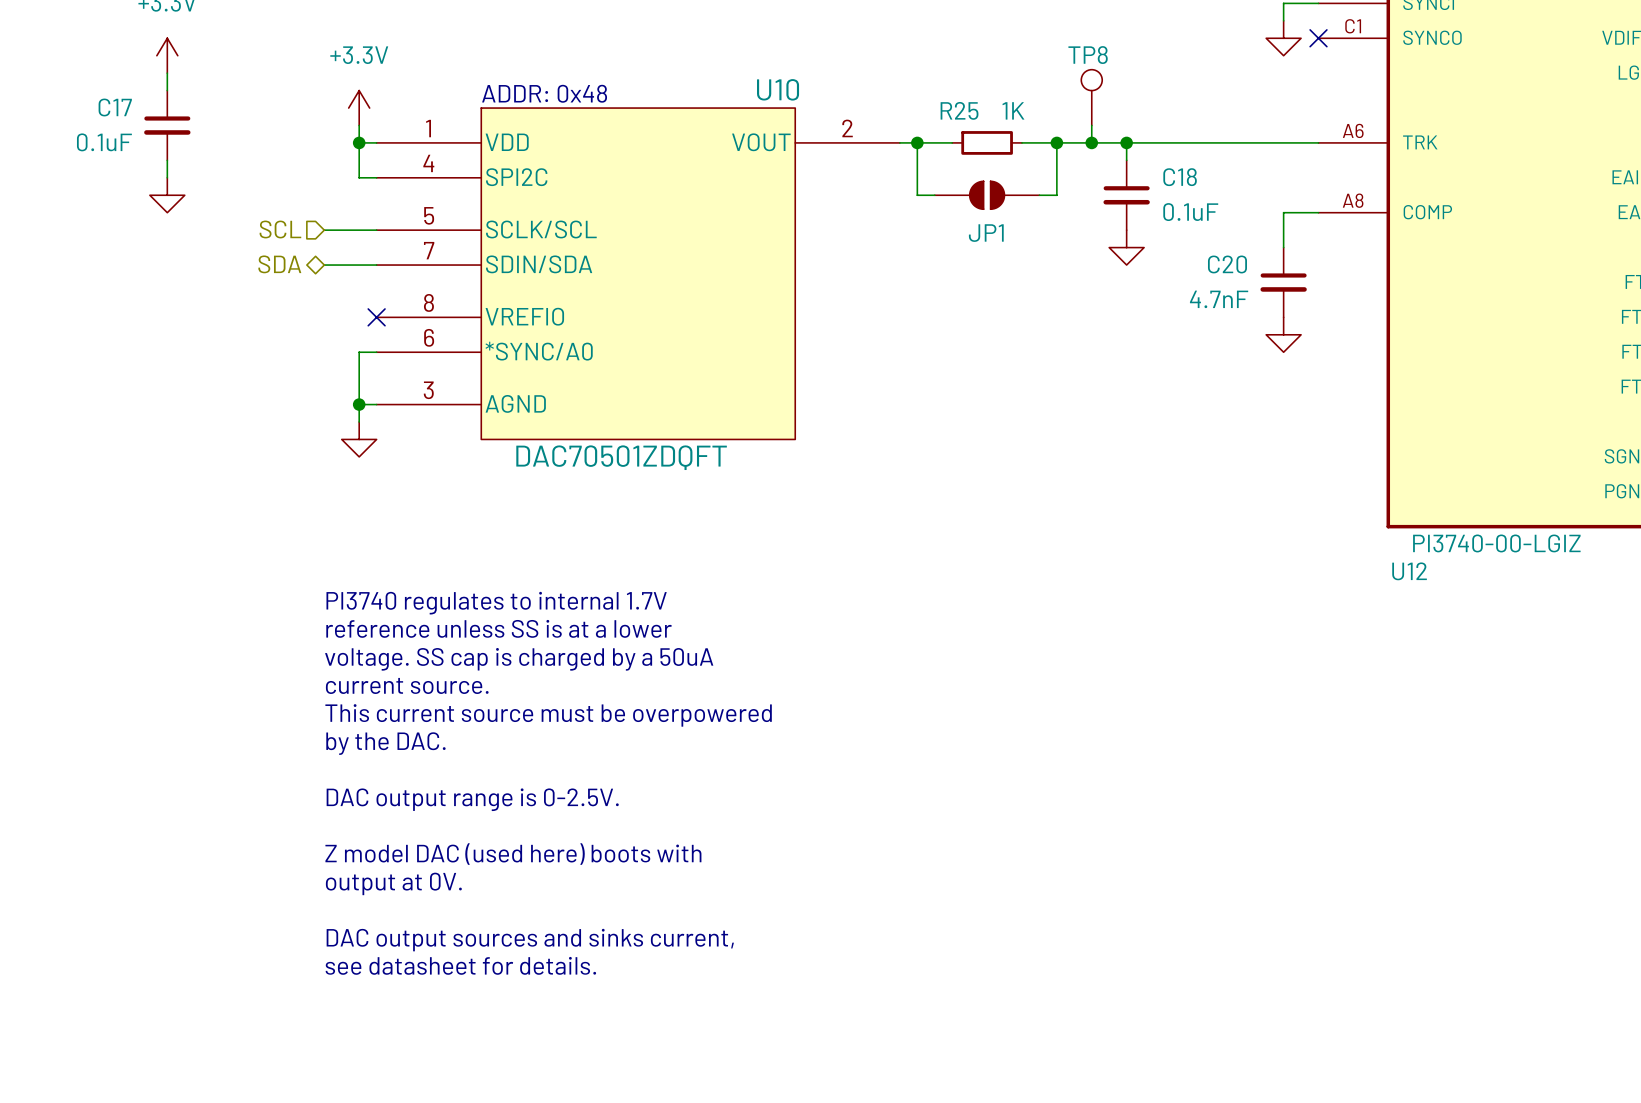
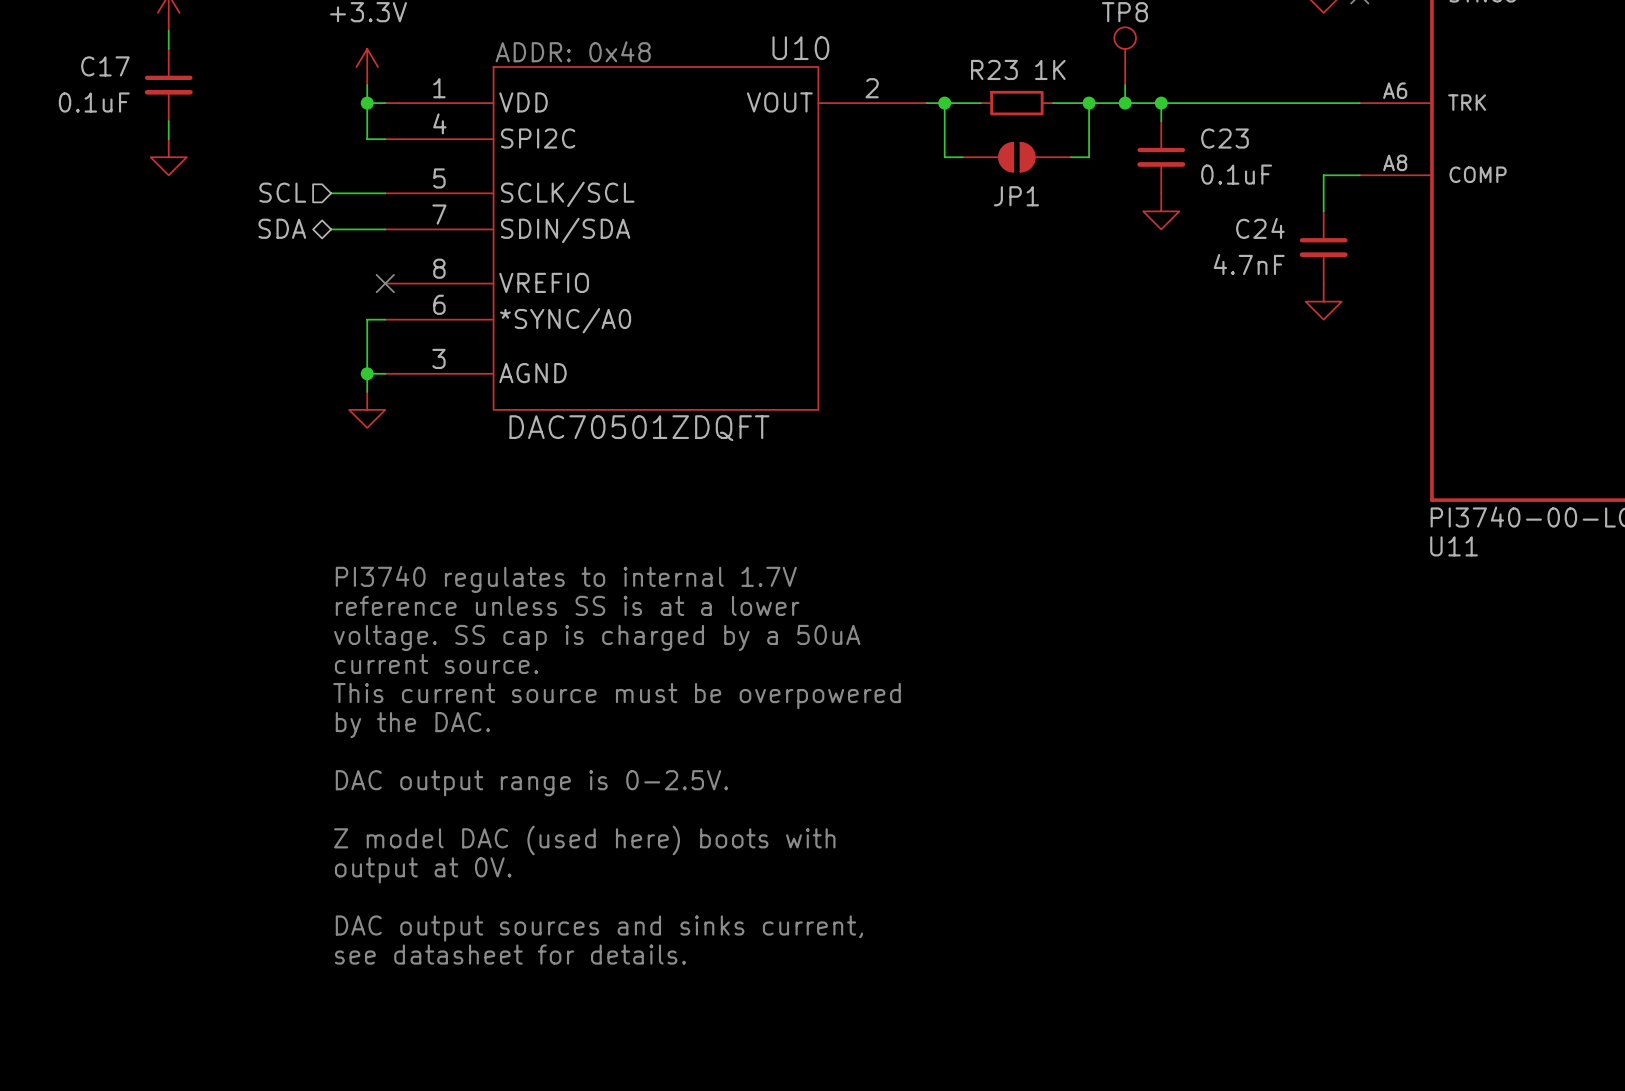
R25 name: R25 (959, 110) -> R23 (994, 69)
C18 name: C18 (1180, 177) -> C23 (1224, 138)
C20 name: C20 (1227, 264) -> C24 (1260, 228)
U12 name: U12 (1409, 571) -> U11 (1454, 546)

